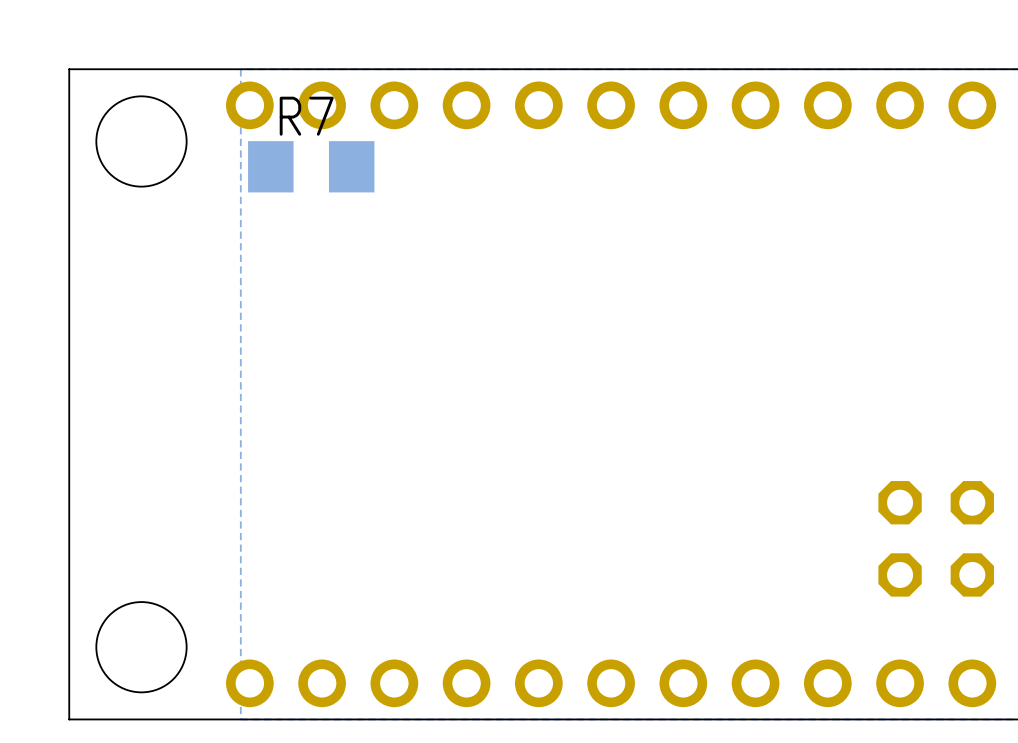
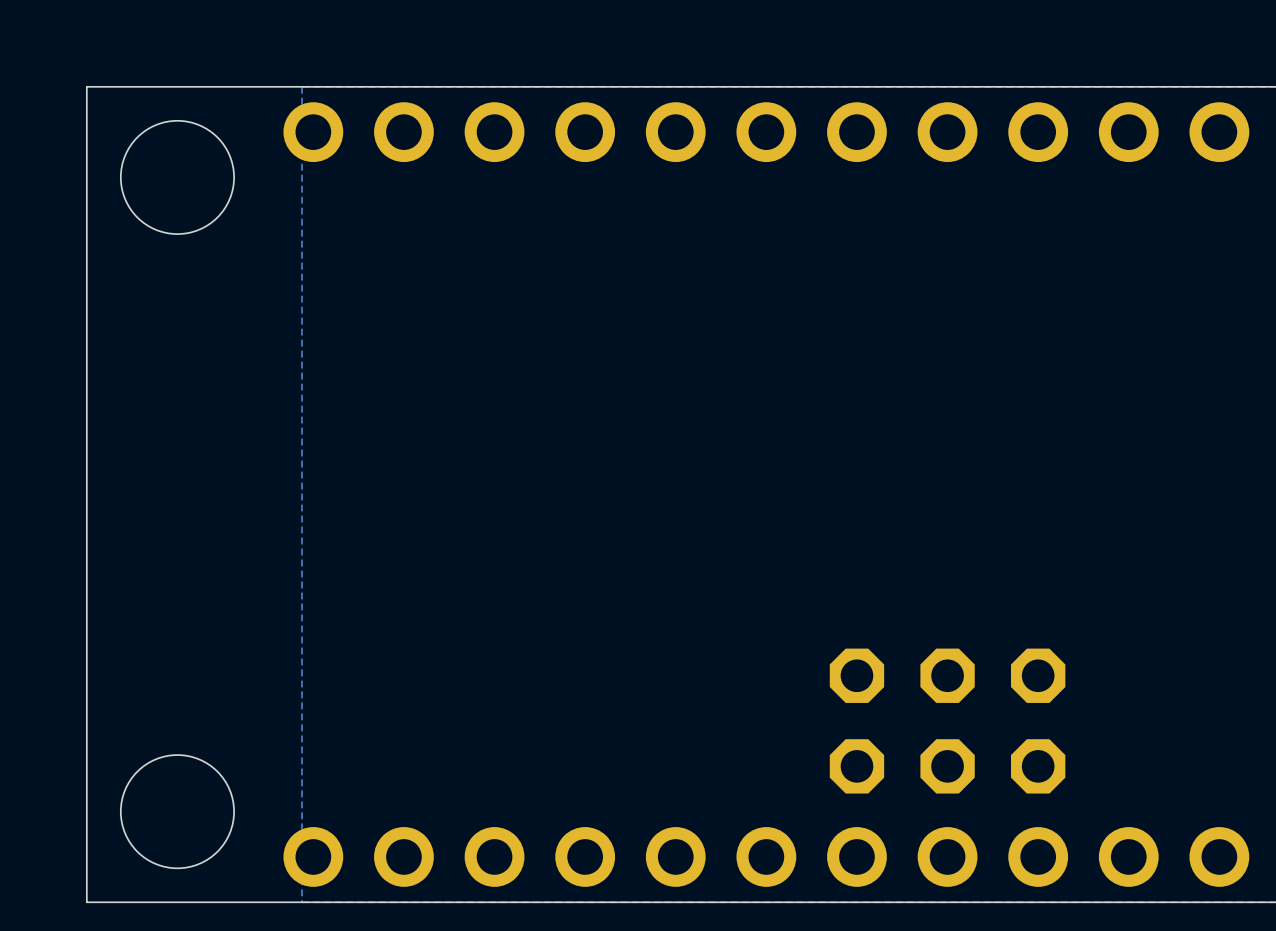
R7: (311, 166) -> none
part: (900, 538) -> none
part: (972, 538) -> none
part: none -> (856, 721)
part: none -> (947, 721)
part: none -> (1038, 721)

